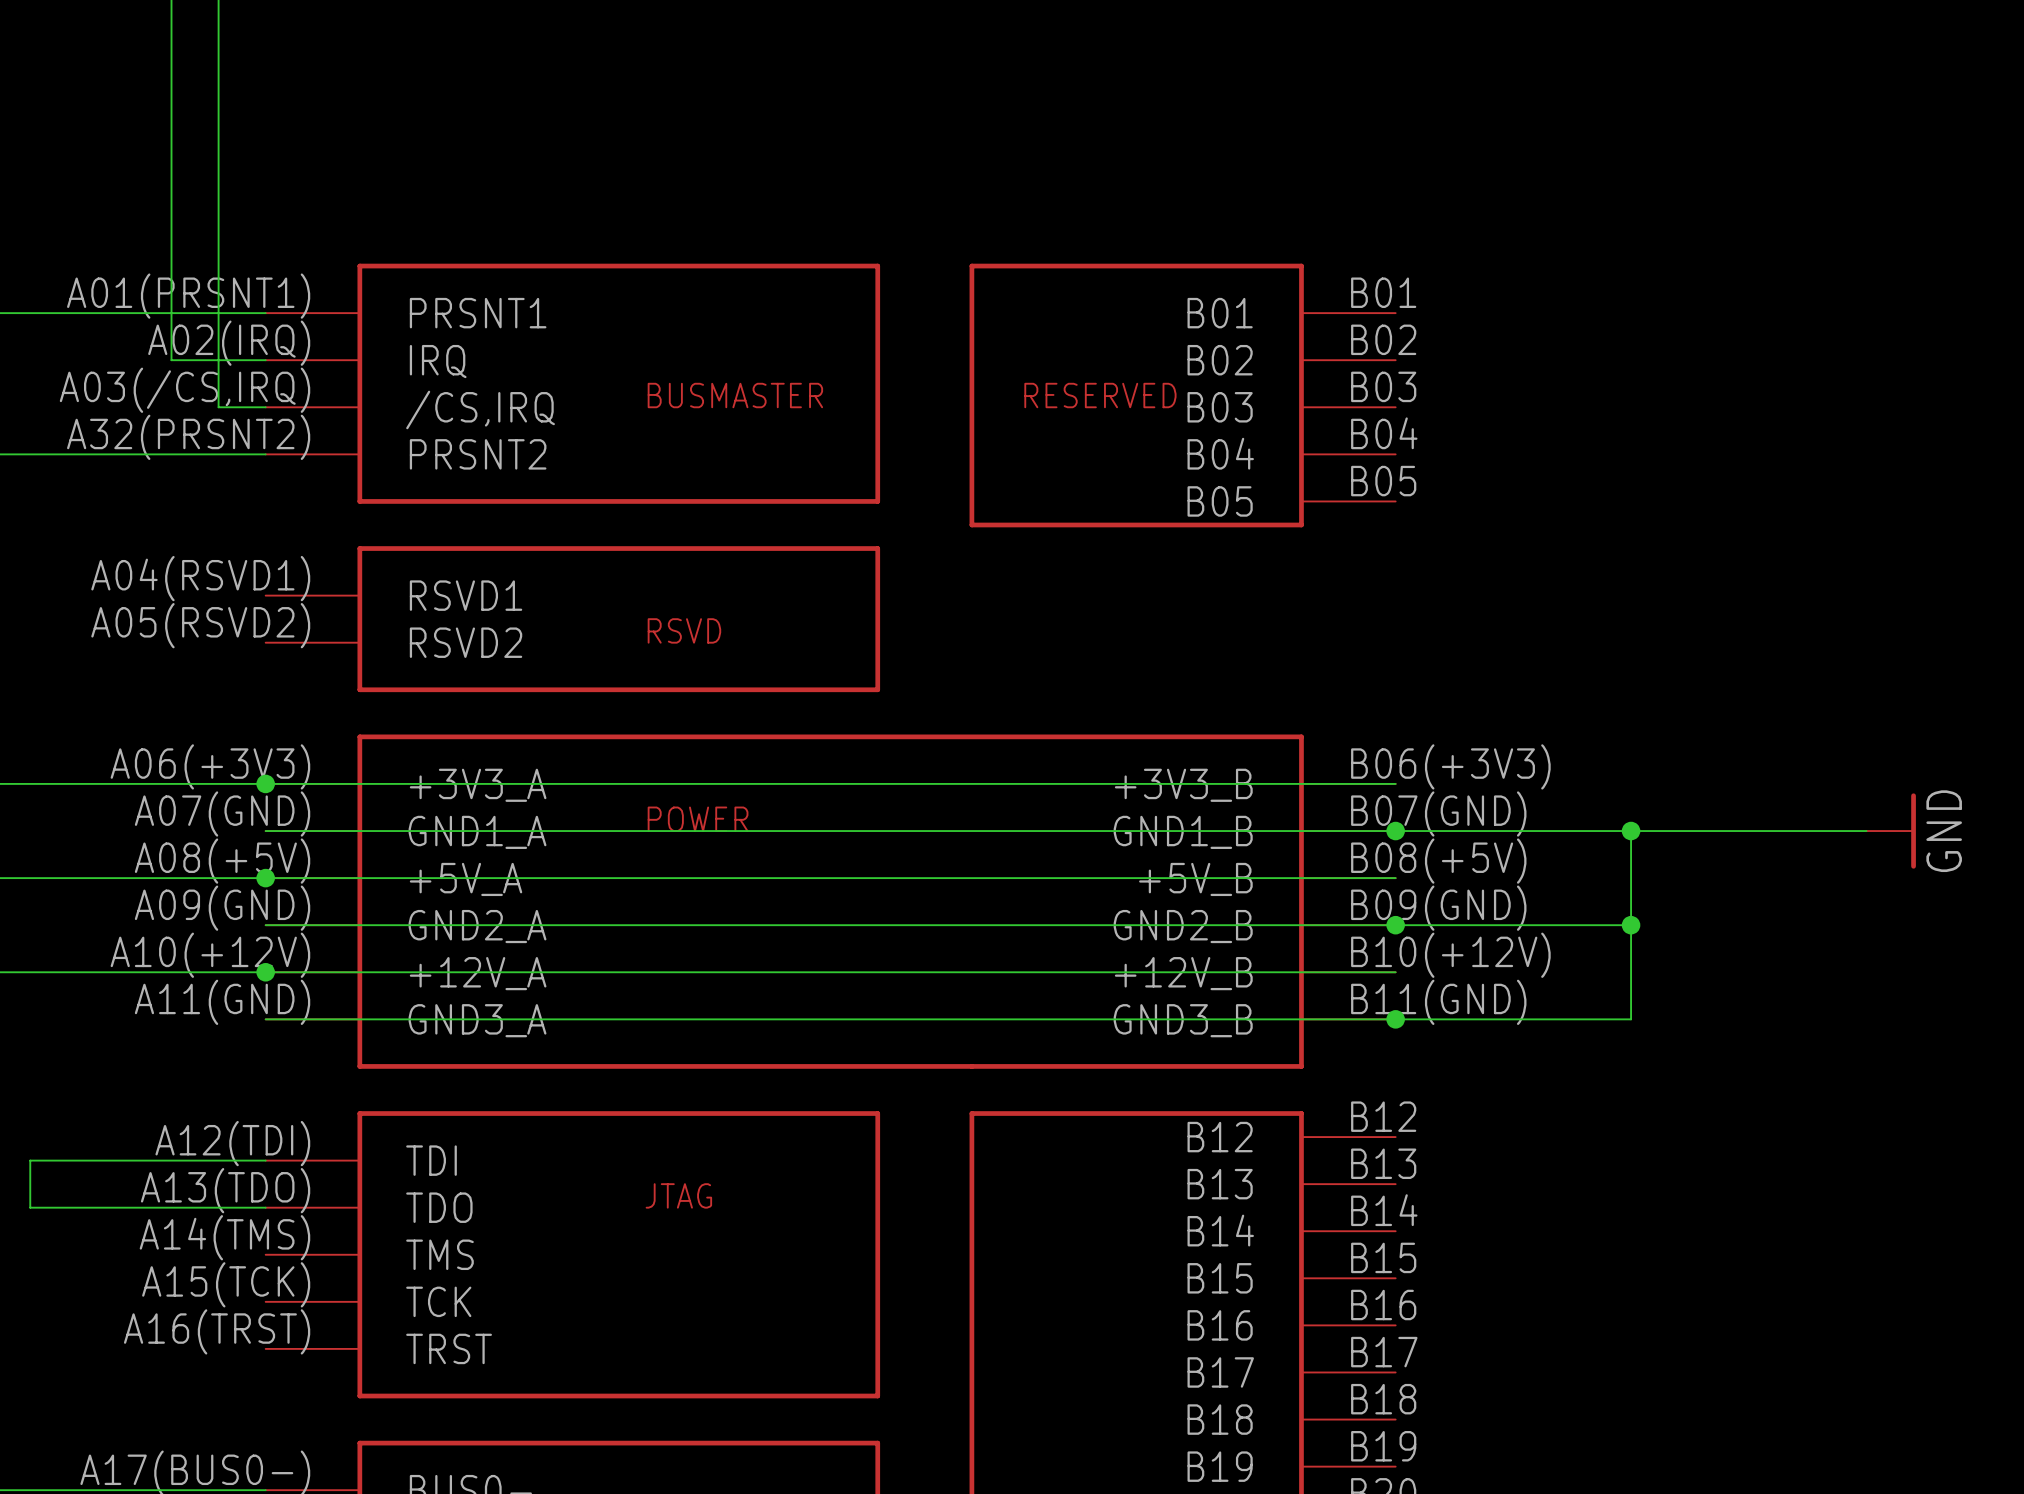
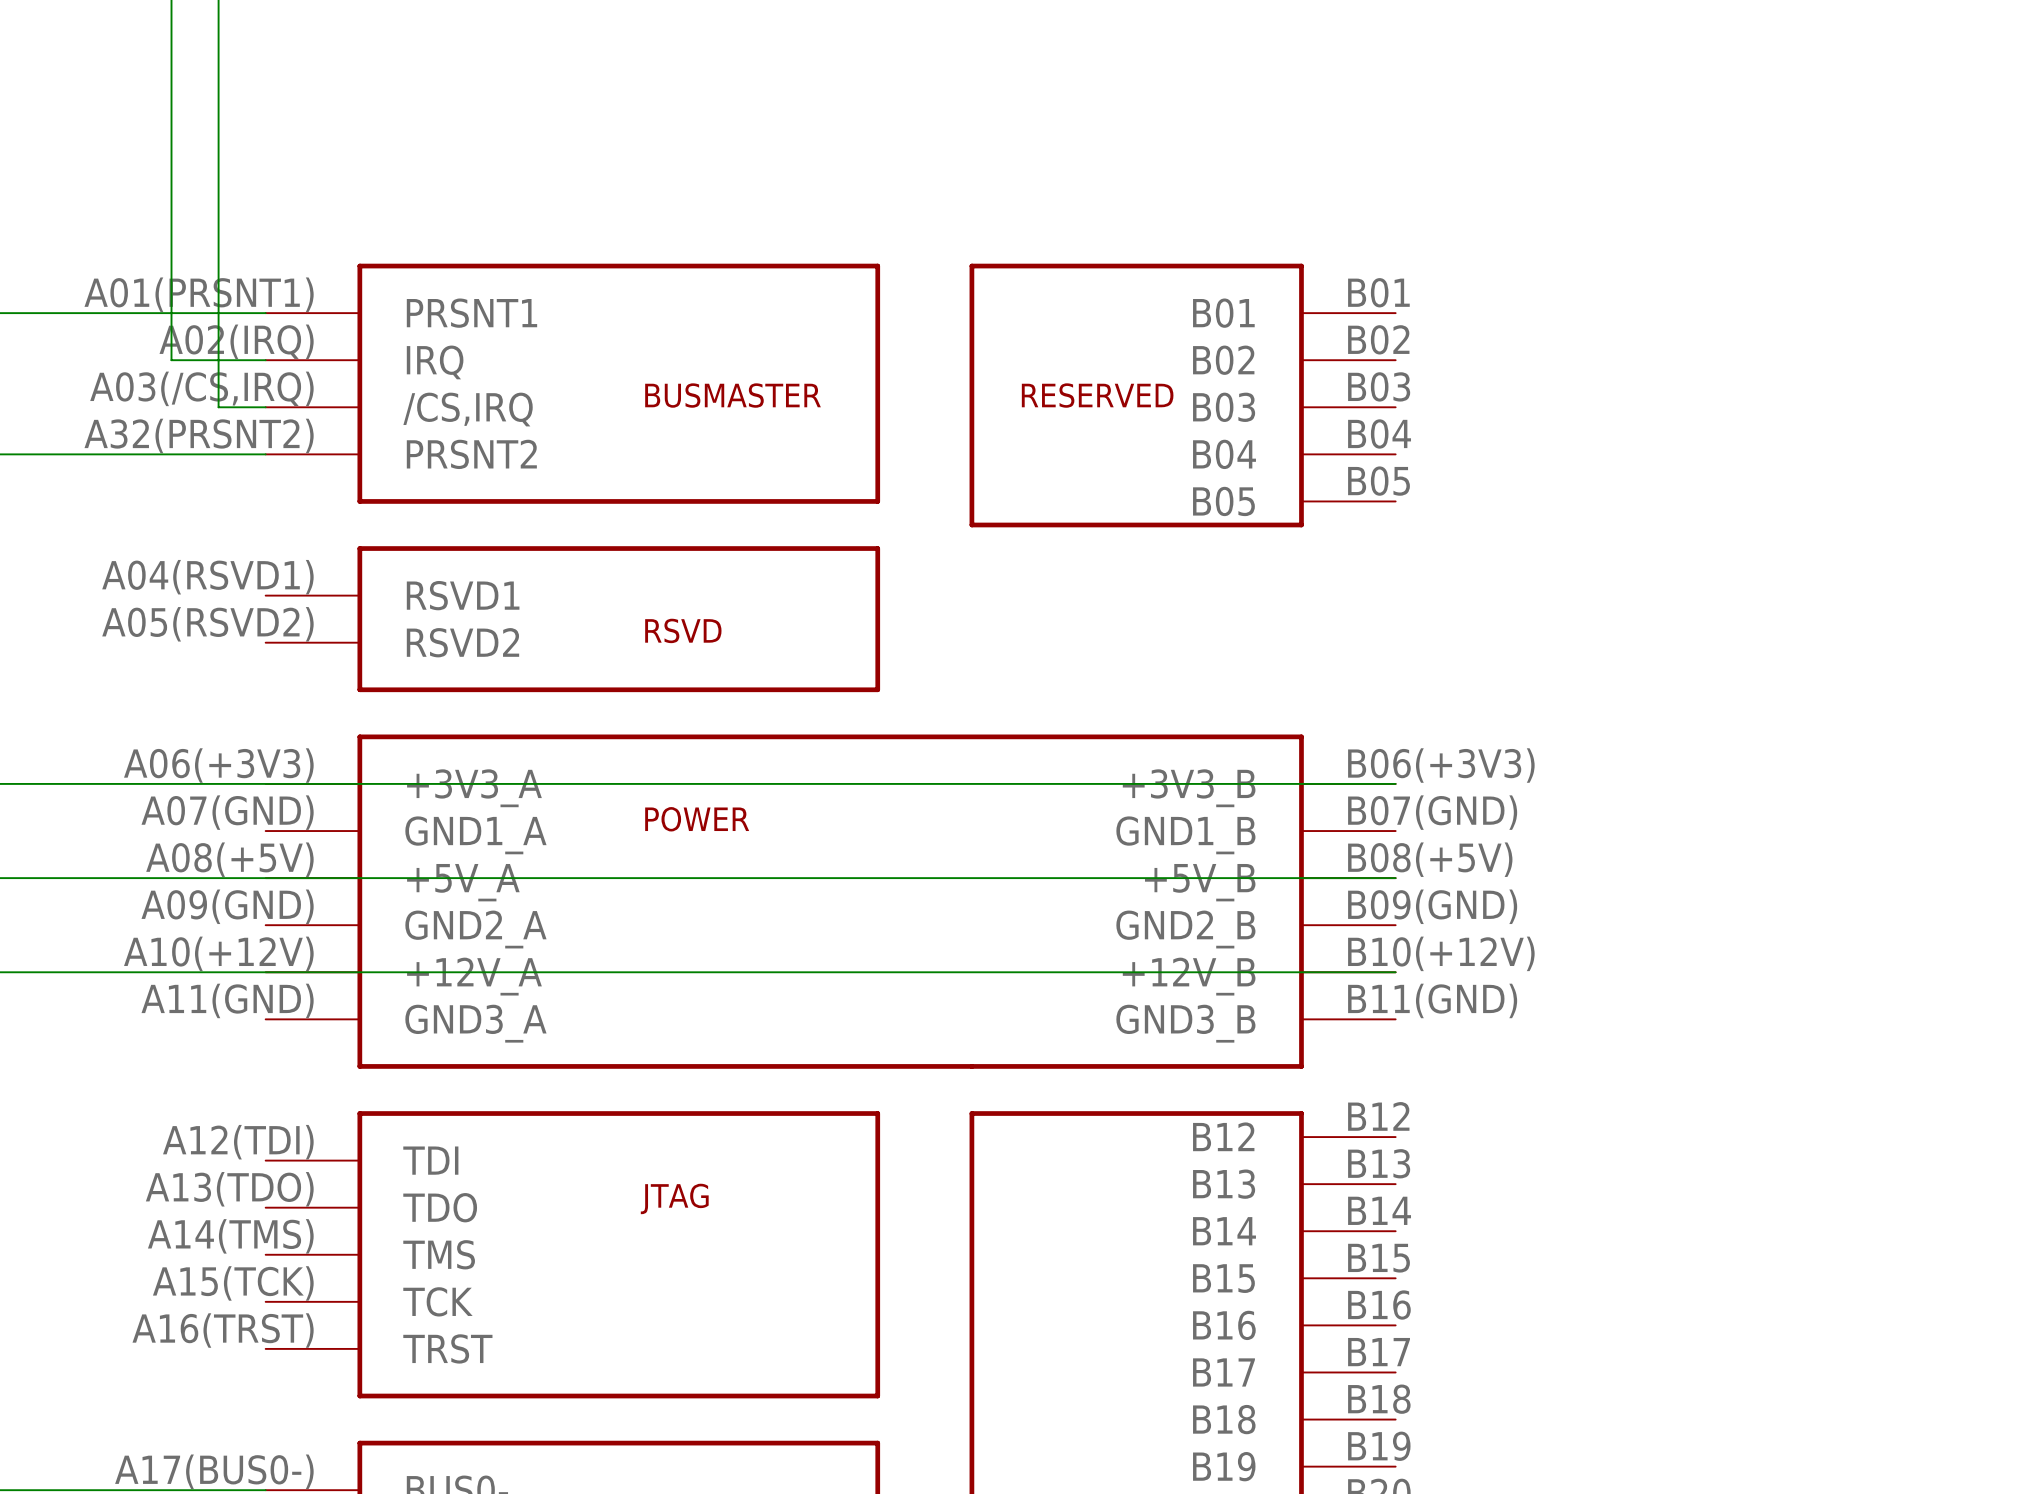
junction: (265, 783) -> none
wire: (265, 831) (1866, 831) -> none
junction: (1395, 831) -> none
wire: (1631, 831) (1631, 1019) (265, 1019) -> none
junction: (1631, 831) -> none
power symbol: GND (1891, 831) -> none
junction: (265, 878) -> none
wire: (265, 925) (1631, 925) -> none
junction: (1395, 925) -> none
junction: (1631, 925) -> none
junction: (265, 972) -> none
junction: (1395, 1019) -> none
wire: (265, 1160) (30, 1160) (30, 1207) (265, 1207) -> none

